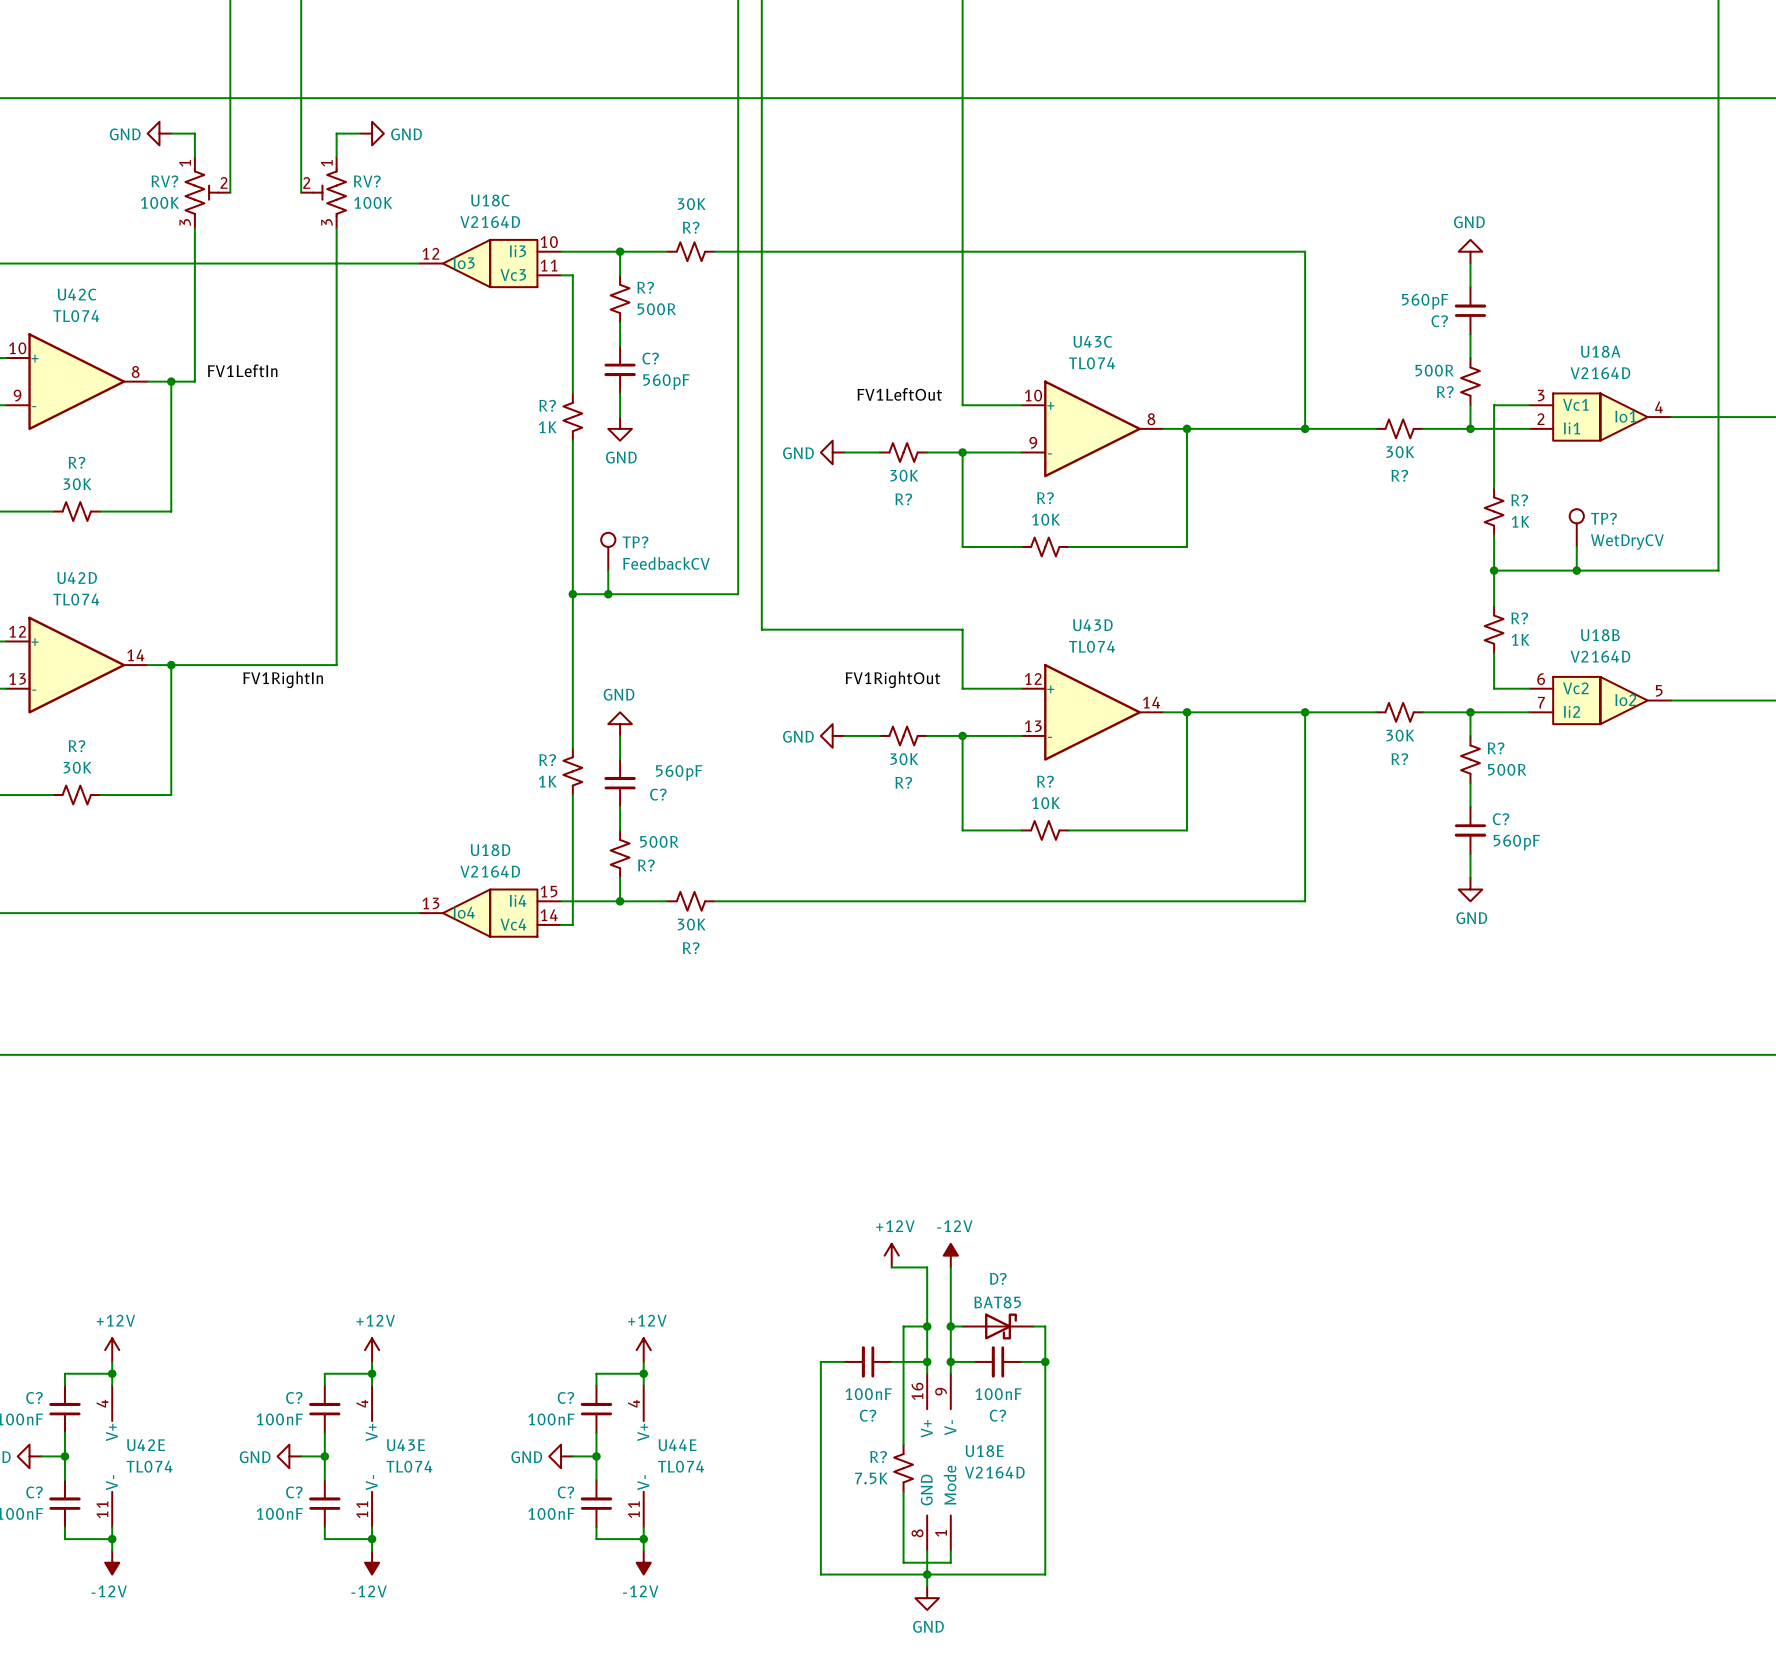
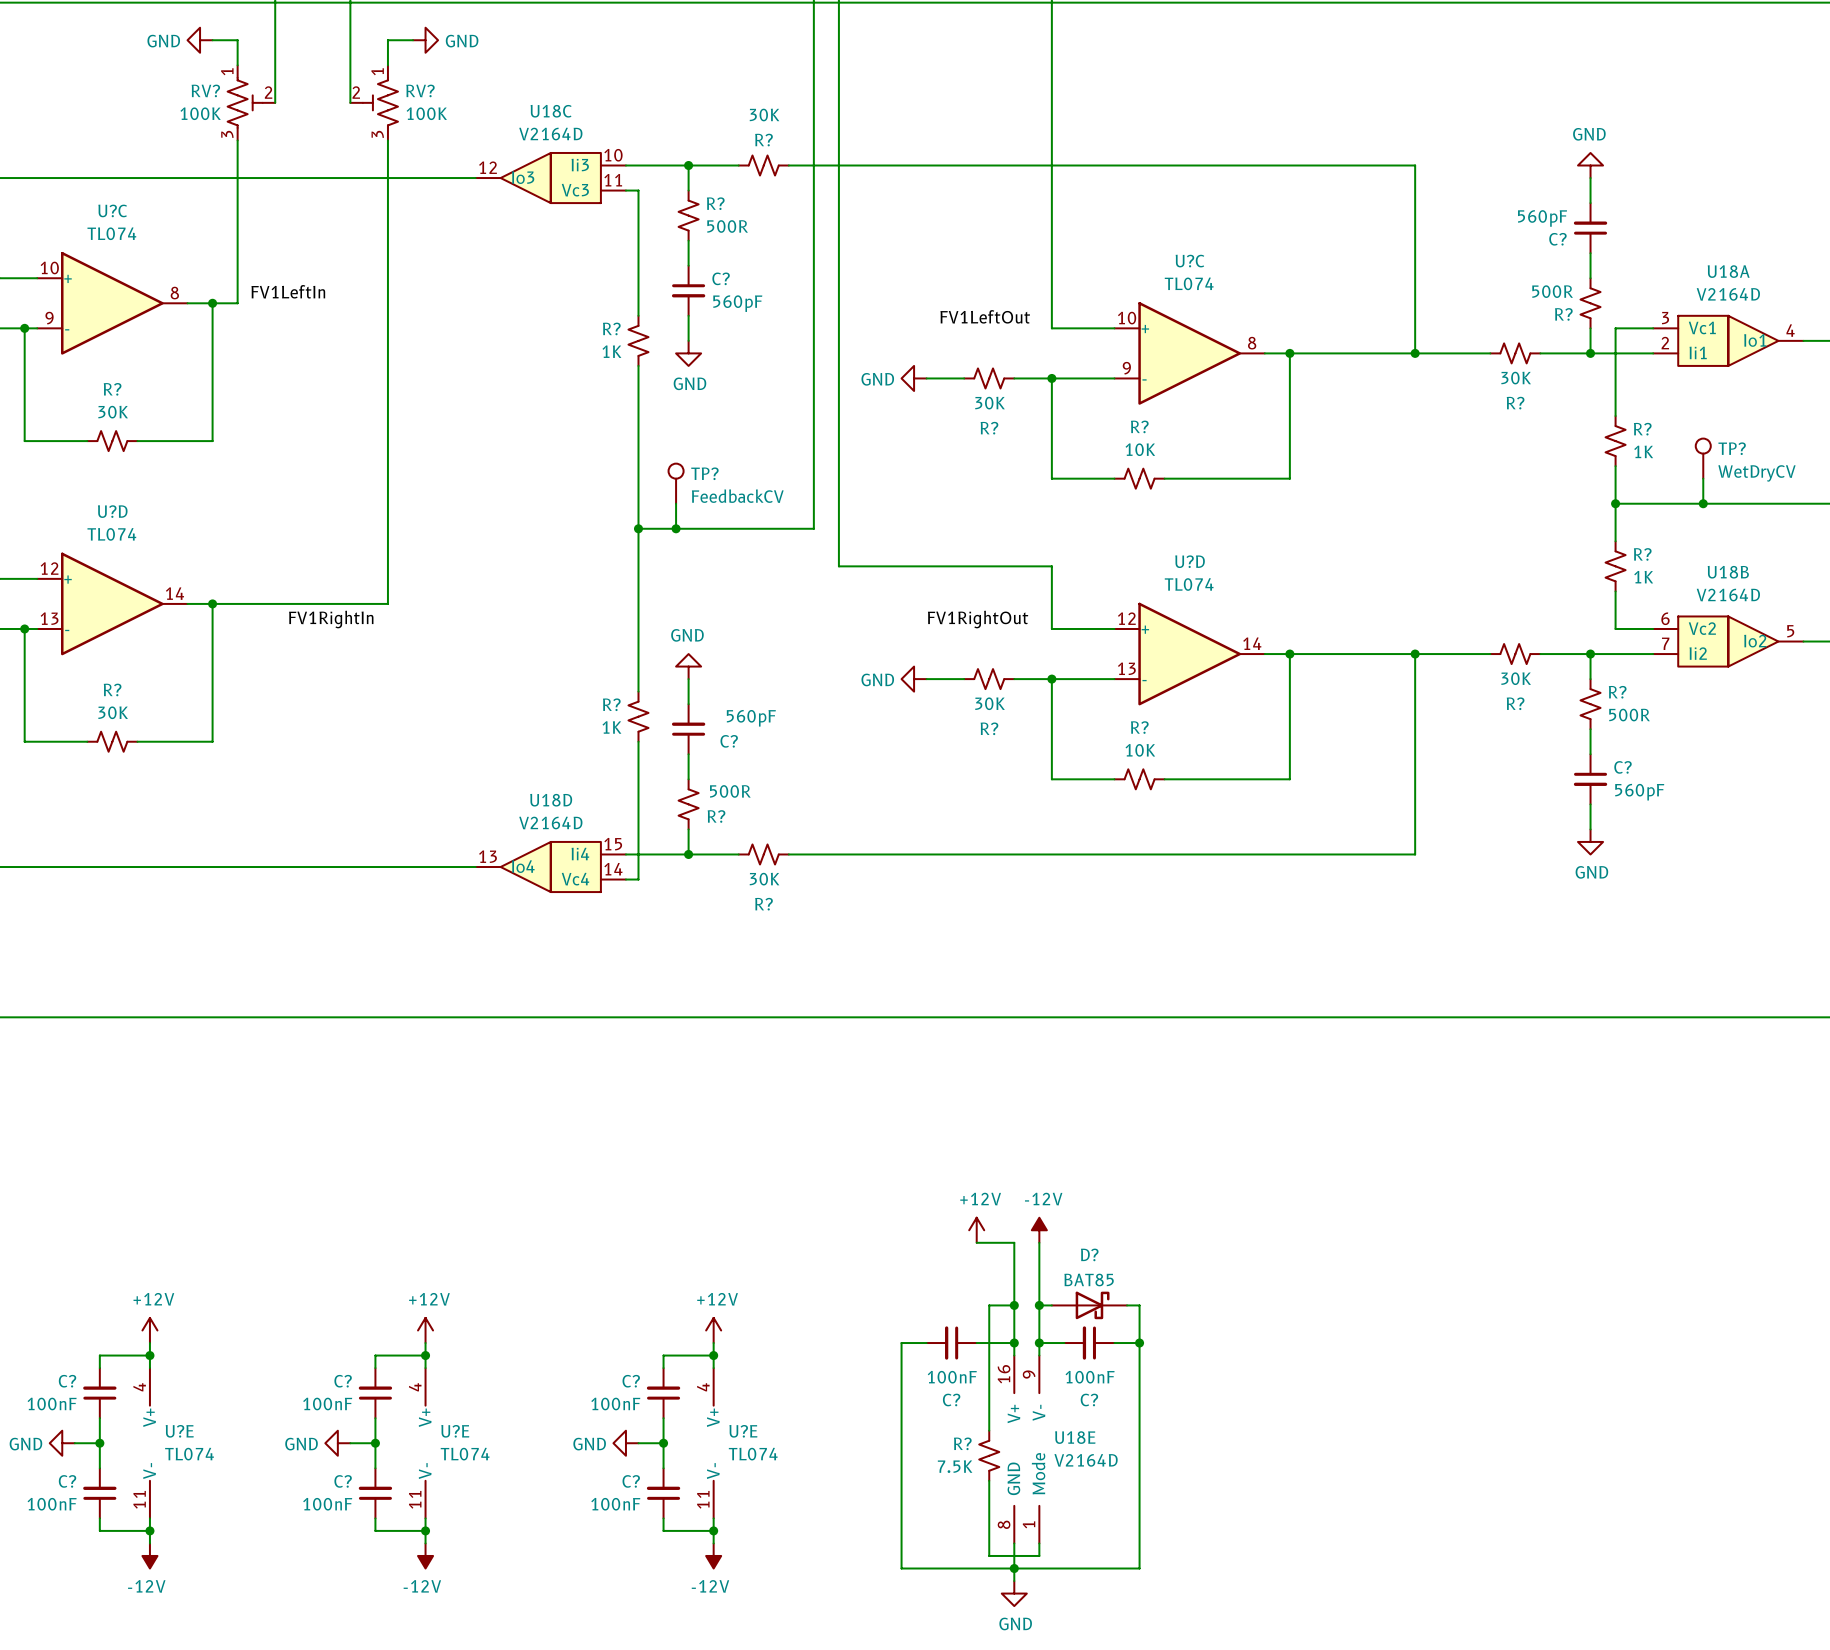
U42C name: U42C (77, 294) -> U?C (112, 210)
U43C name: U43C (1092, 341) -> U?C (1189, 261)
U42D name: U42D (77, 578) -> U?D (112, 511)
U43D name: U43D (1092, 625) -> U?D (1190, 561)
U42E name: U42E (146, 1445) -> U?E (179, 1431)
U43E name: U43E (405, 1445) -> U?E (455, 1431)
U44E name: U44E (677, 1445) -> U?E (743, 1431)

